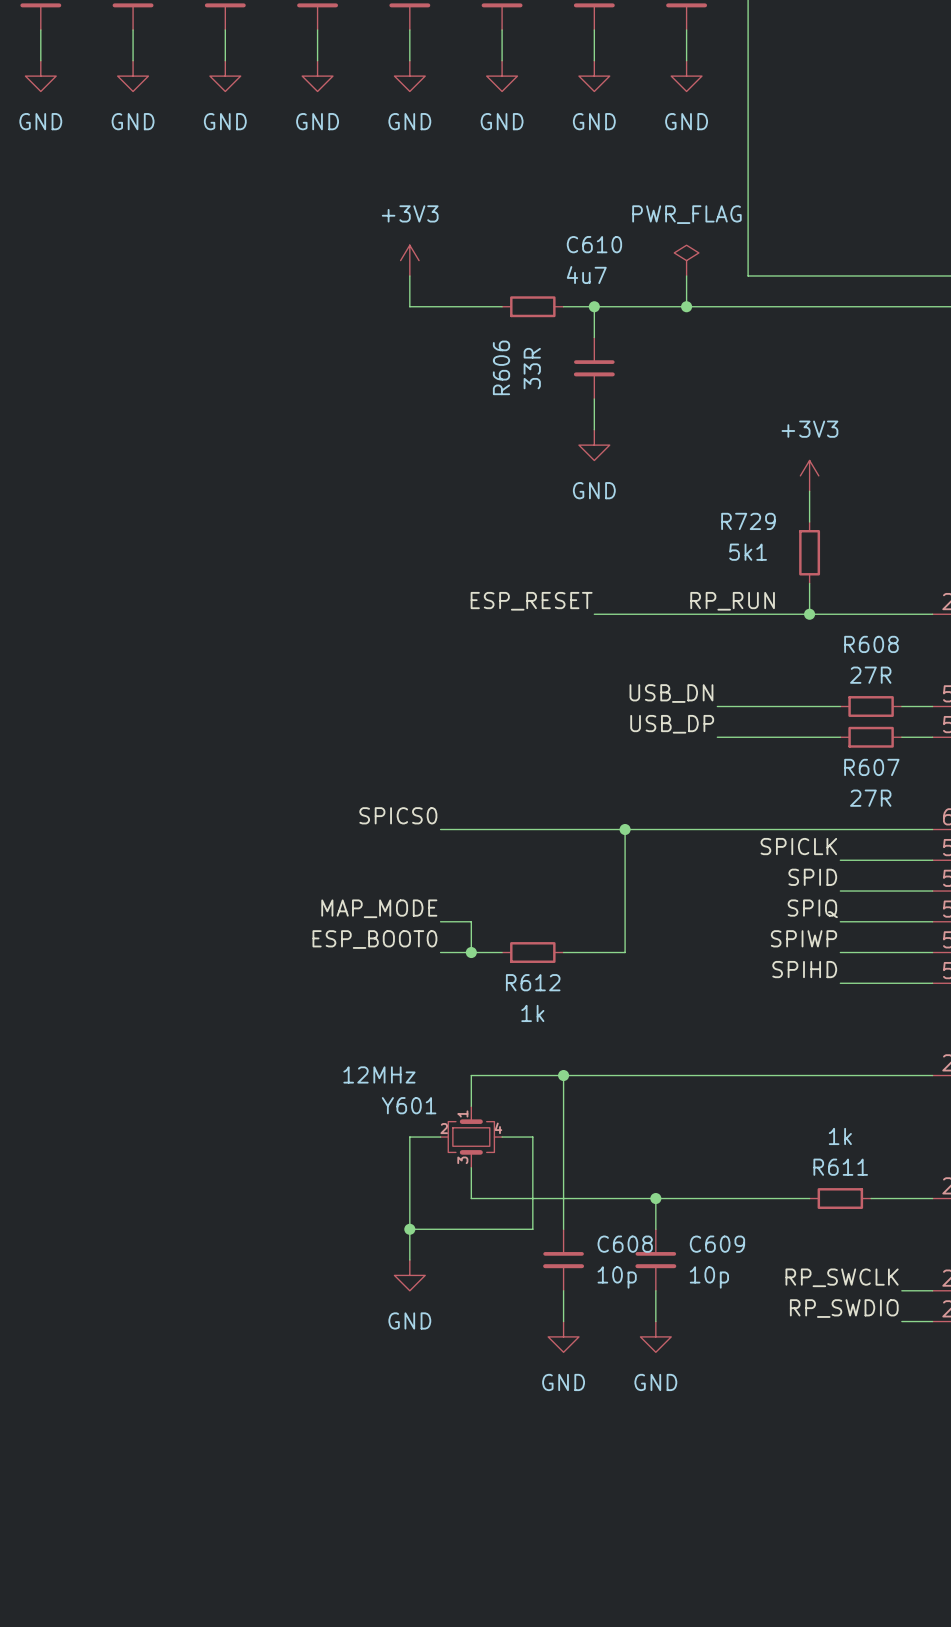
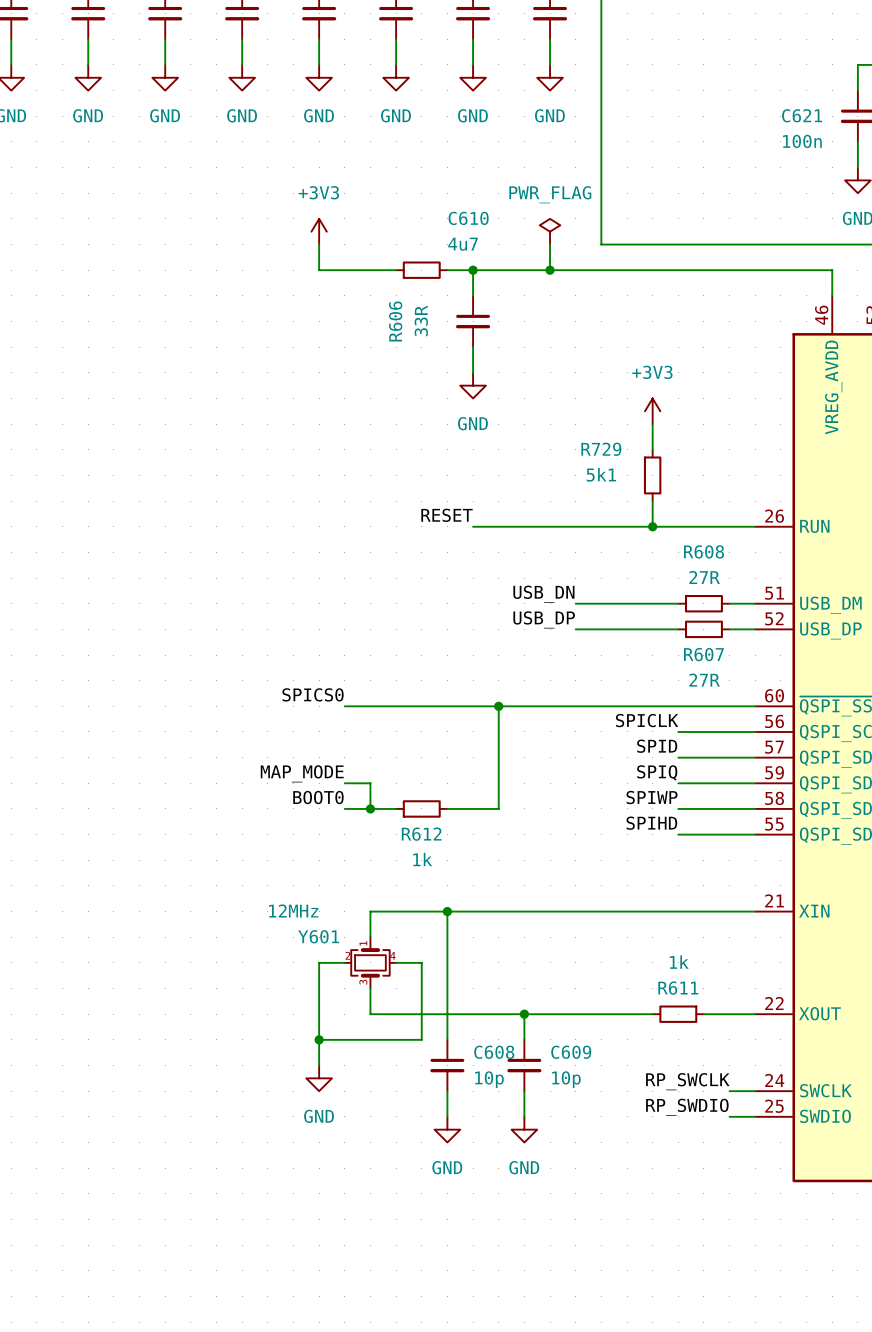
label: ESP_RESET (531, 601) -> RESET (447, 515)
label: RP_RUN (732, 601) -> none
label: ESP_BOOT0 (374, 939) -> BOOT0 (318, 797)

